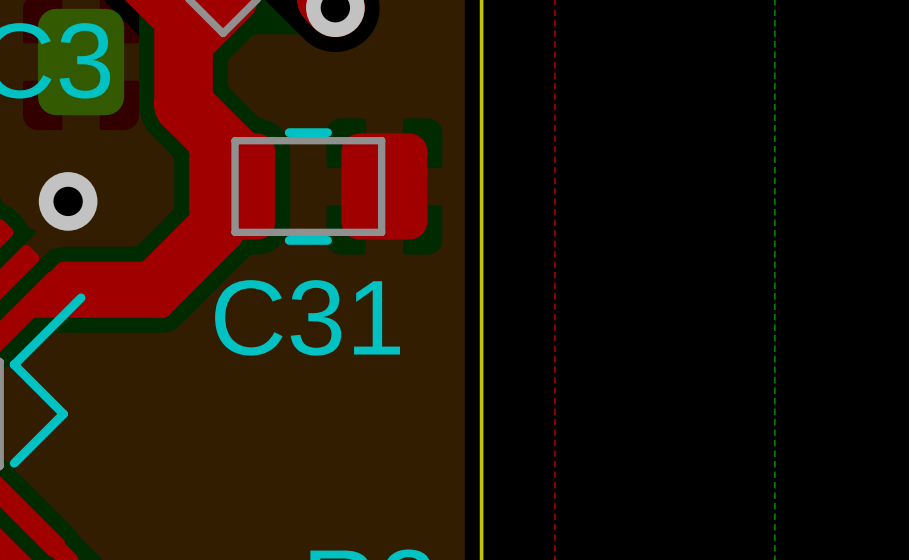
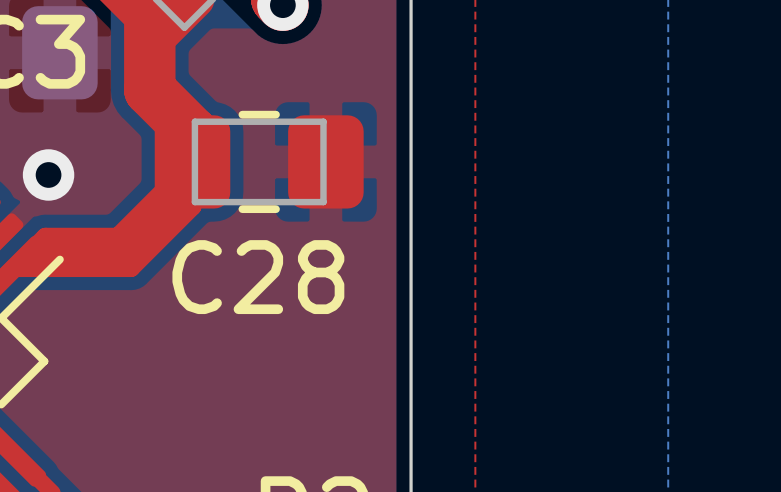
C31 name: C31 (307, 317) -> C28 (258, 277)

